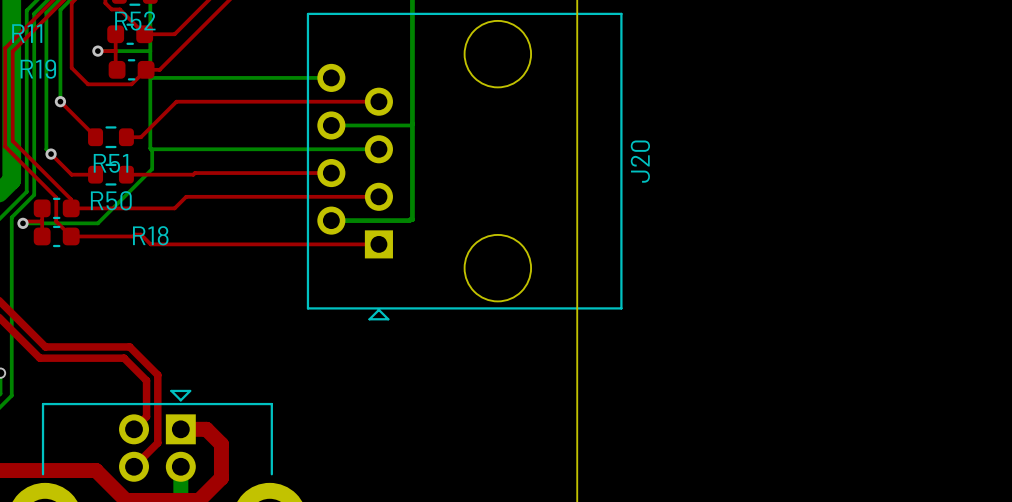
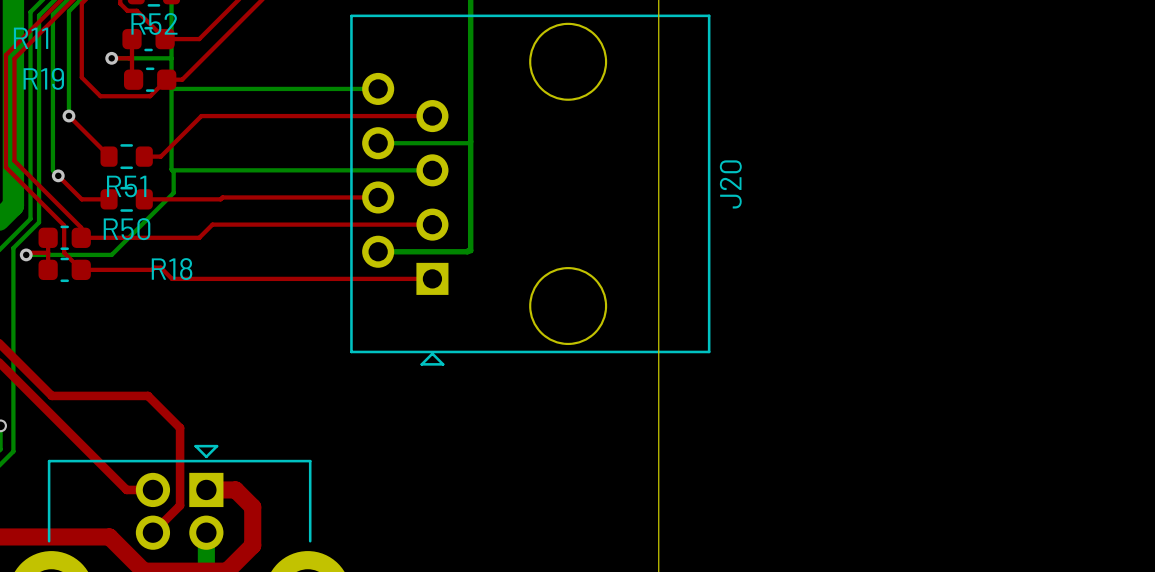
top track: (39, 358) (124, 358) (146, 380) (146, 416) (134, 429) -> (45, 408) (126, 489) (152, 489)

